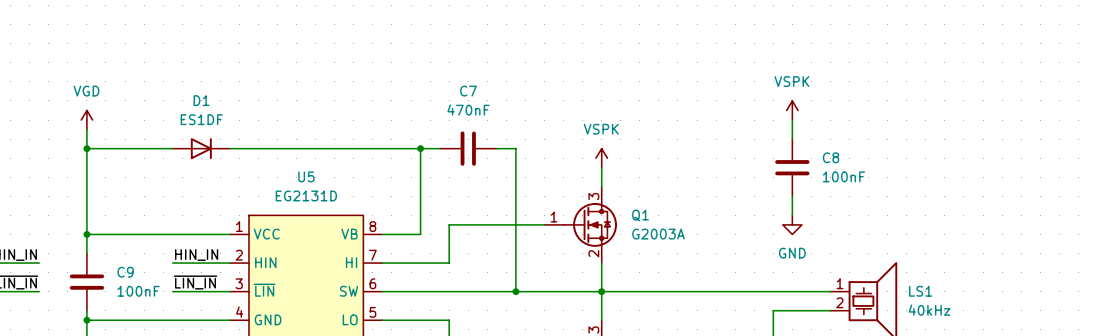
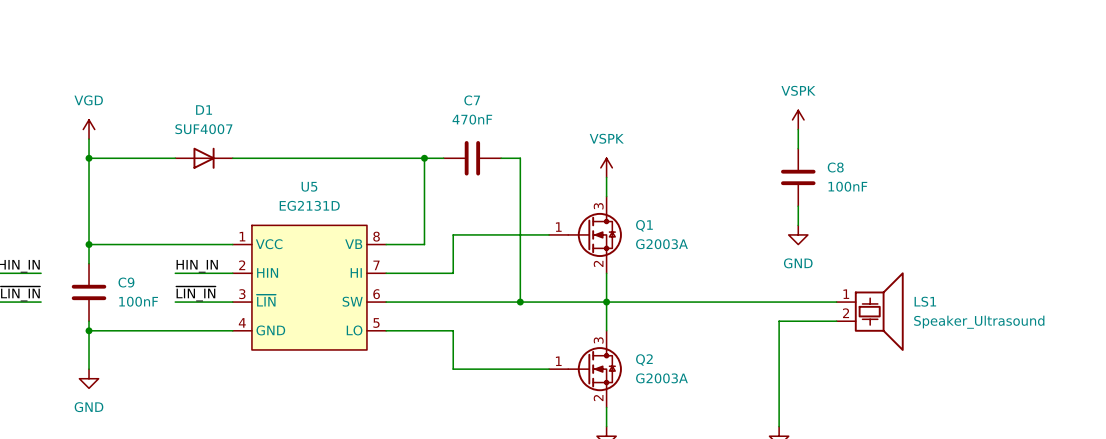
D1 value: ES1DF (201, 119) -> SUF4007 (203, 129)
LS1 value: 40kHz (929, 310) -> Speaker_Ultrasound (979, 322)

